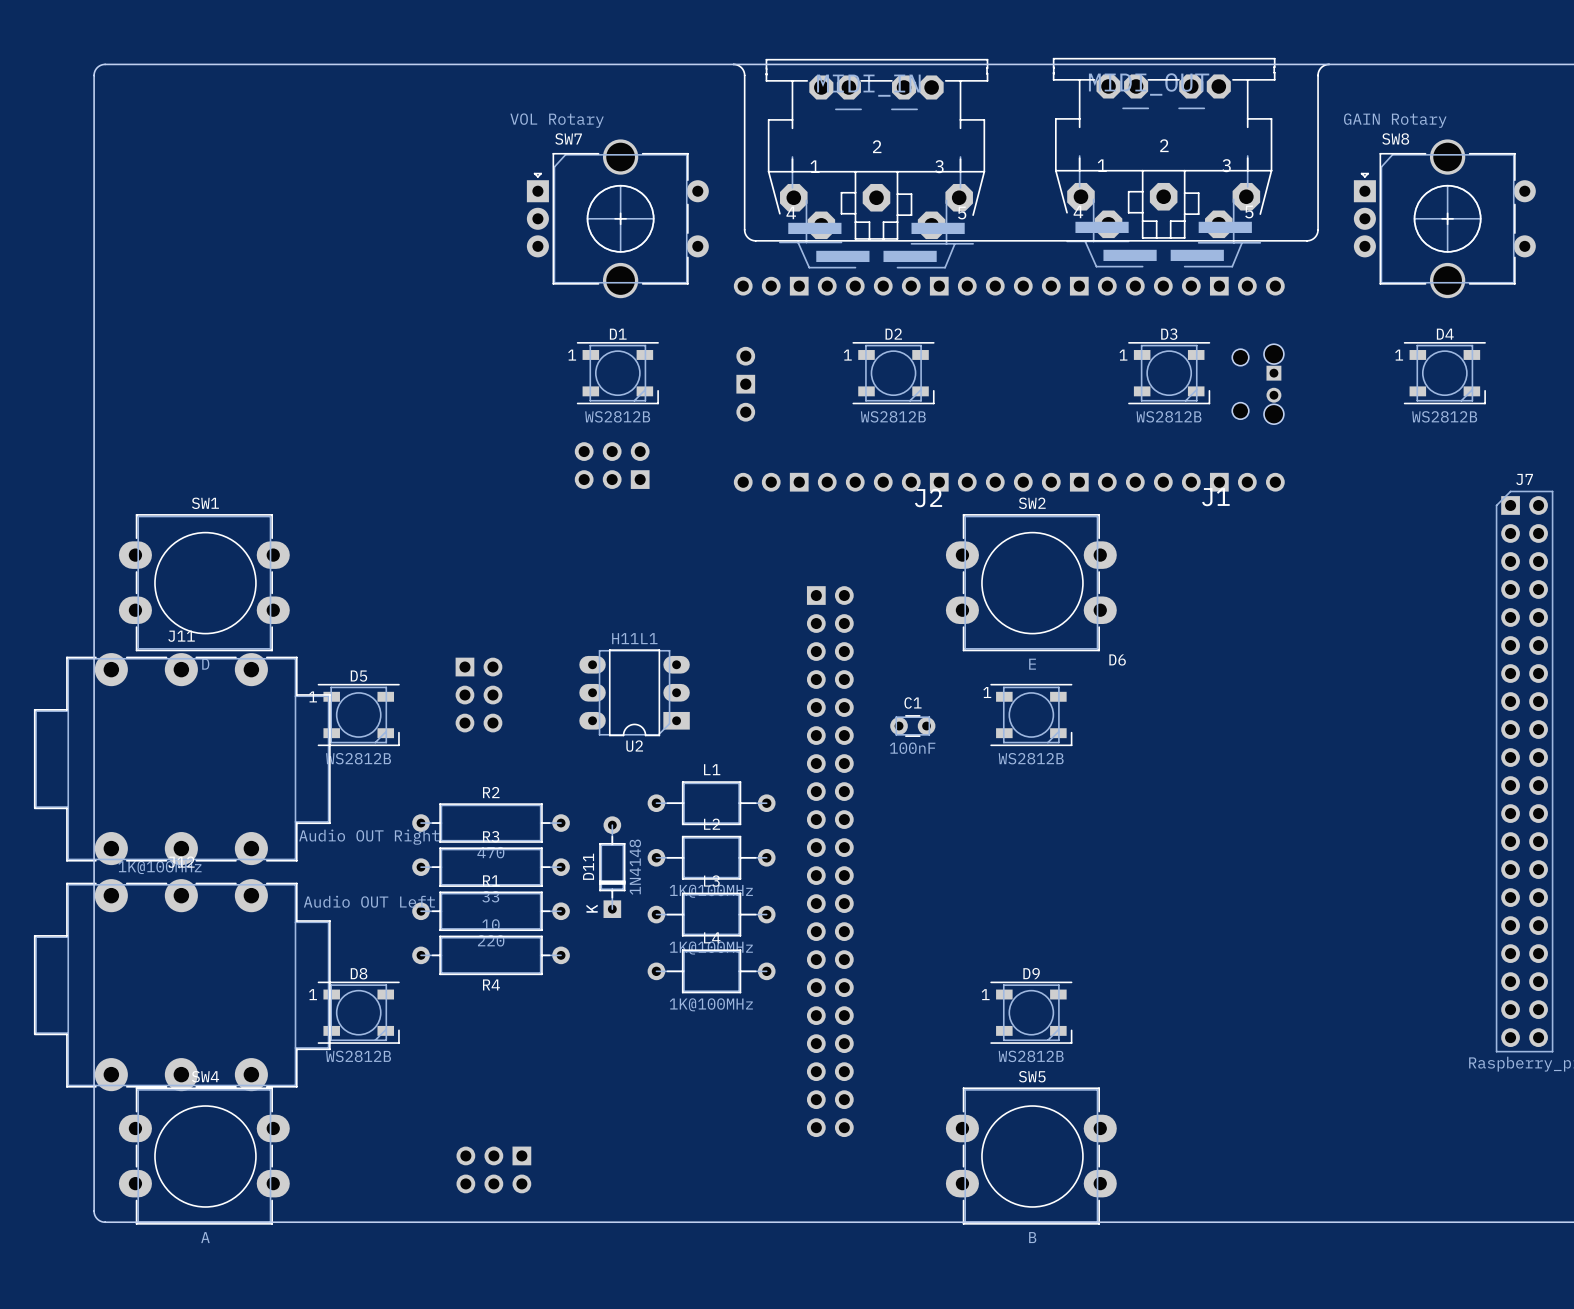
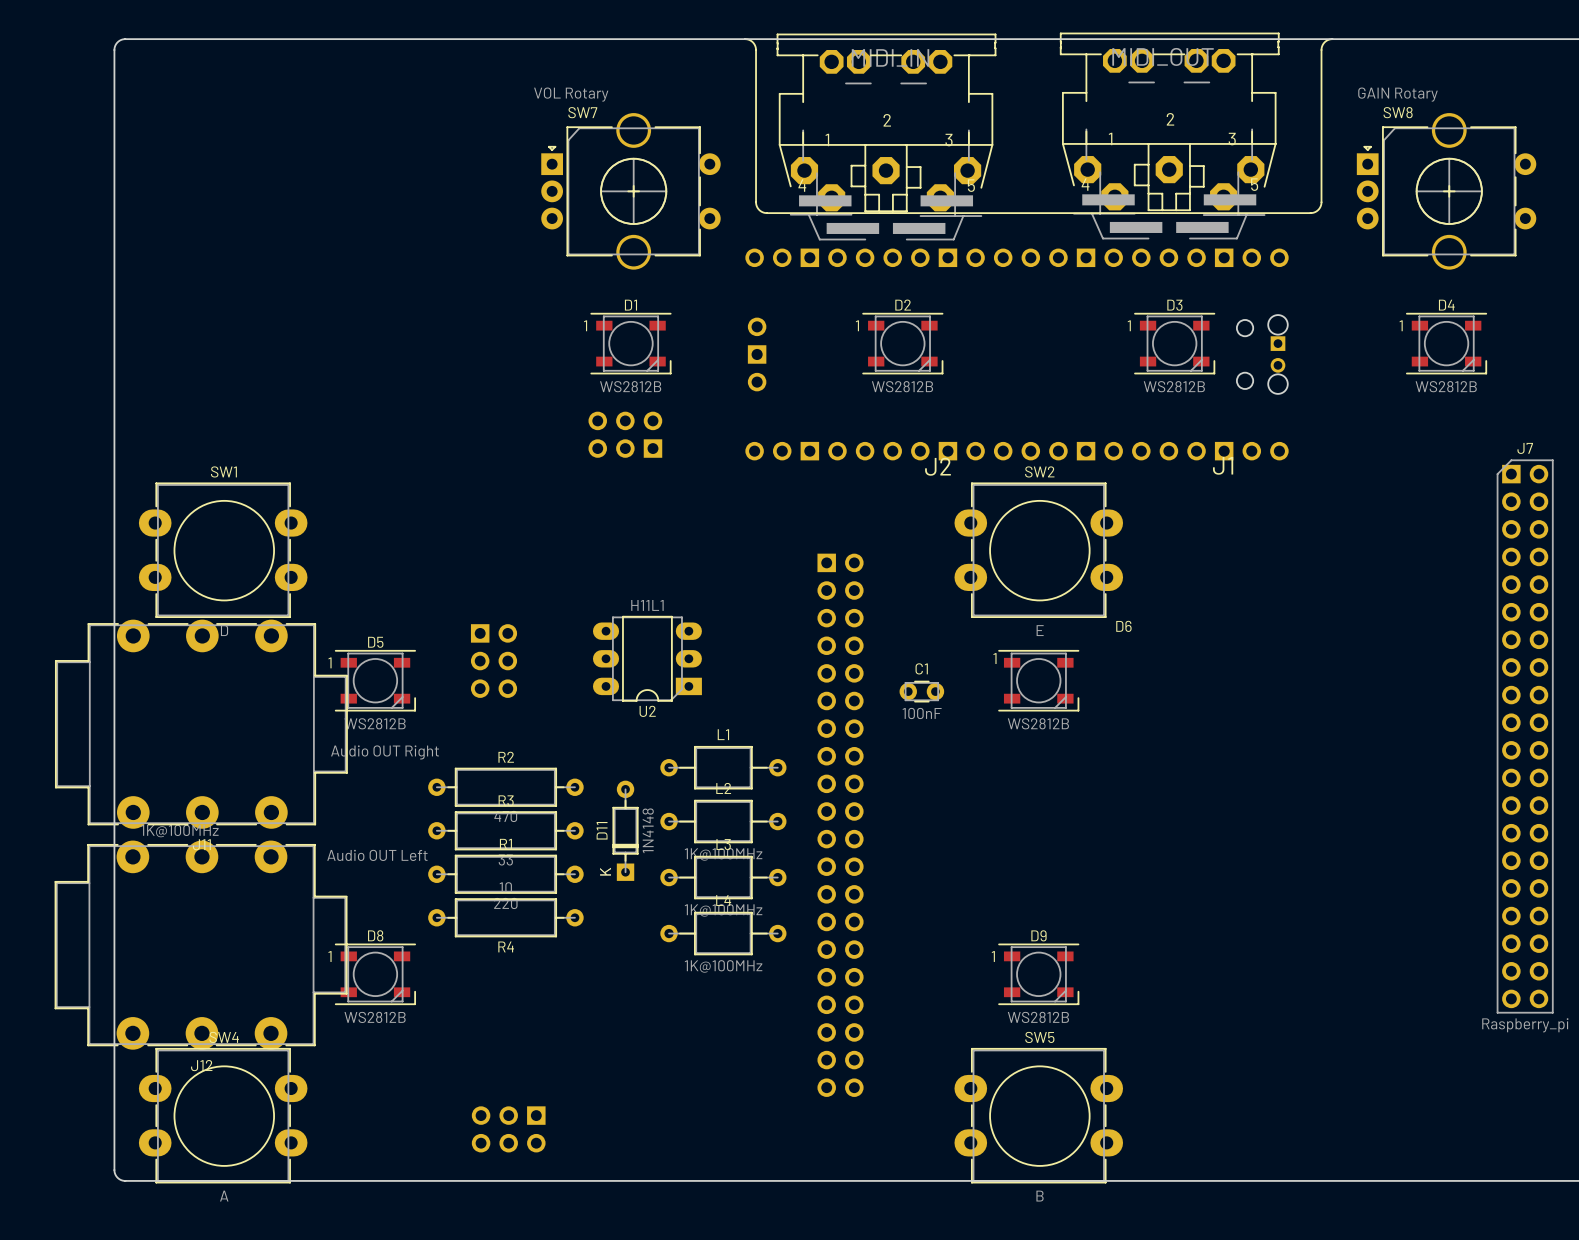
J11 rotation: 0° (182, 759) -> 180° (201, 724)
J11 value position: Audio OUT Right (369, 837) -> Audio OUT Right (385, 752)
J12 rotation: 0° (182, 985) -> 180° (201, 945)

